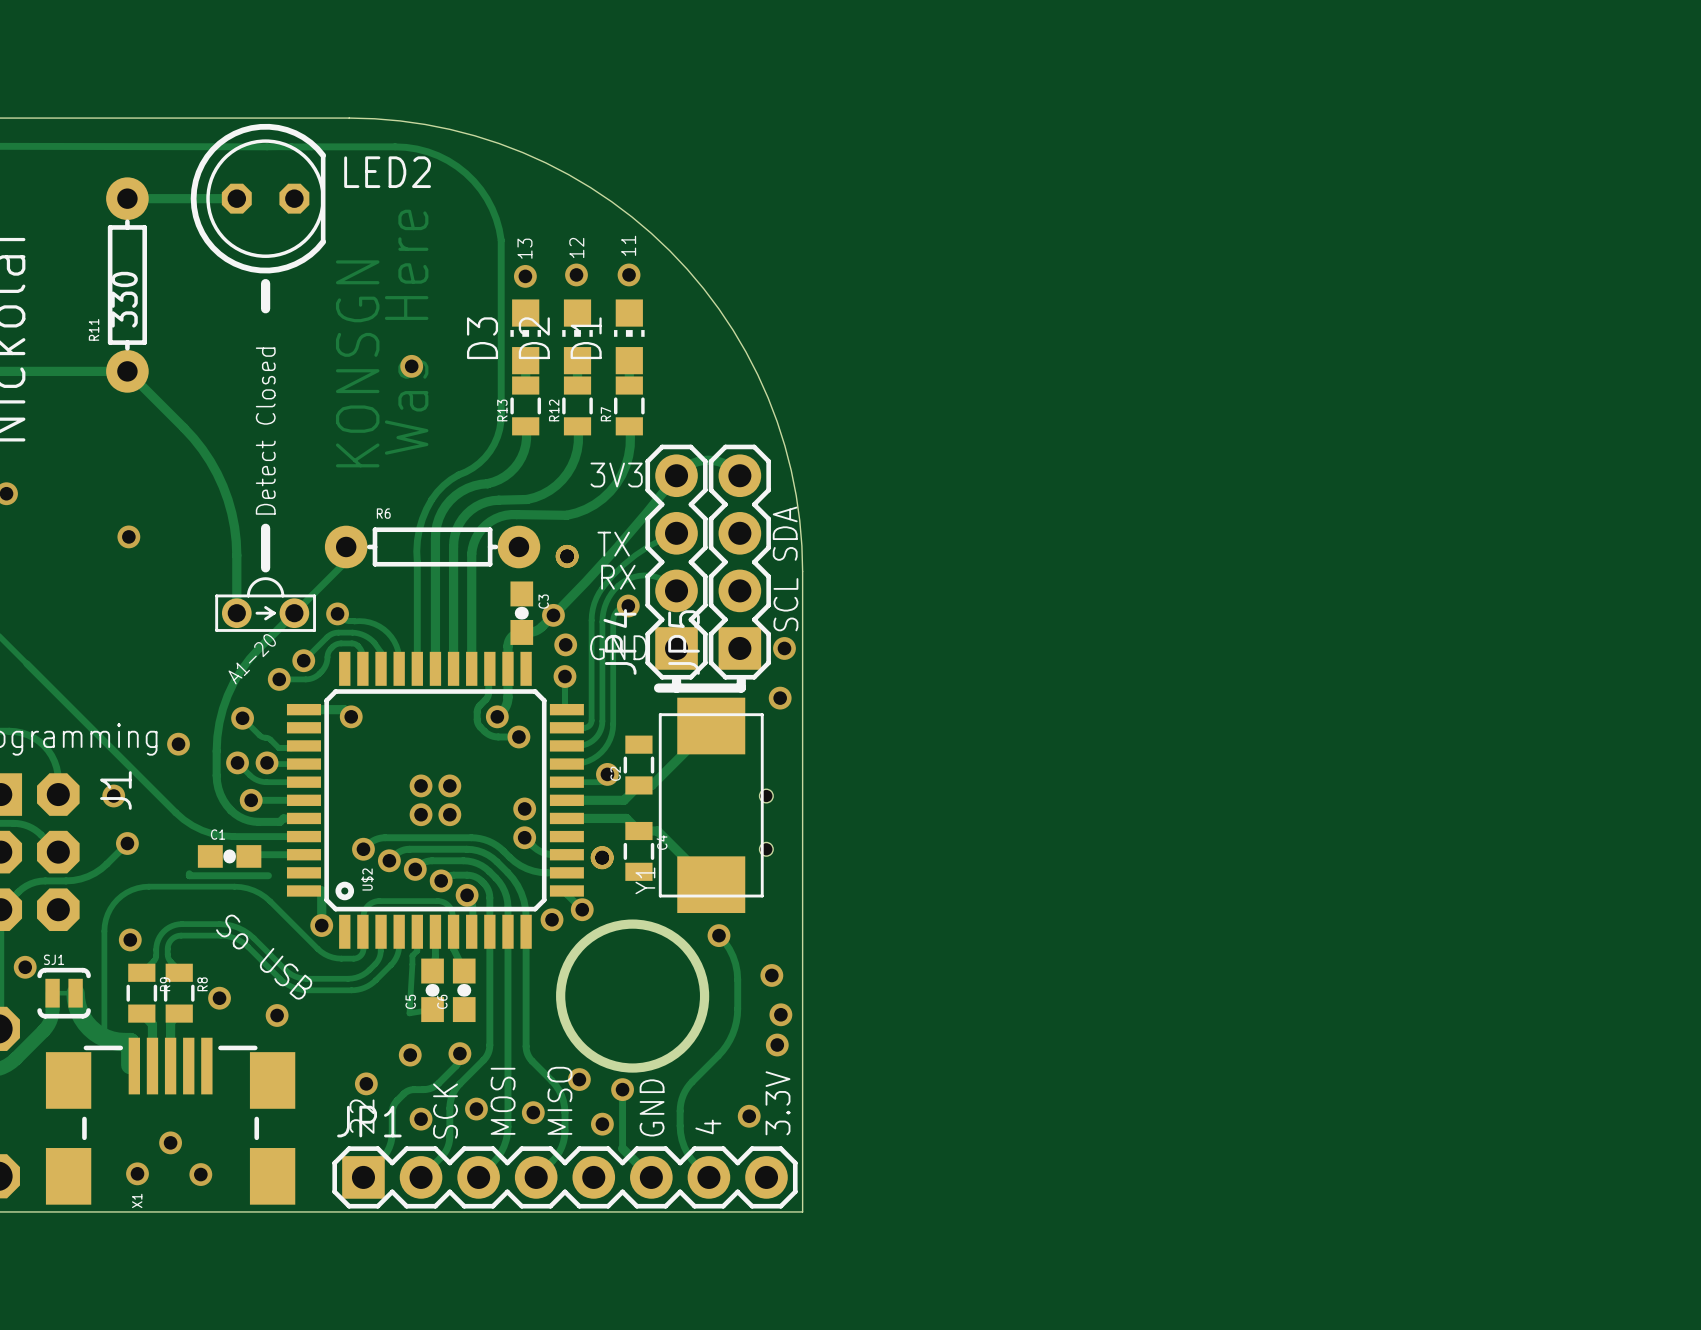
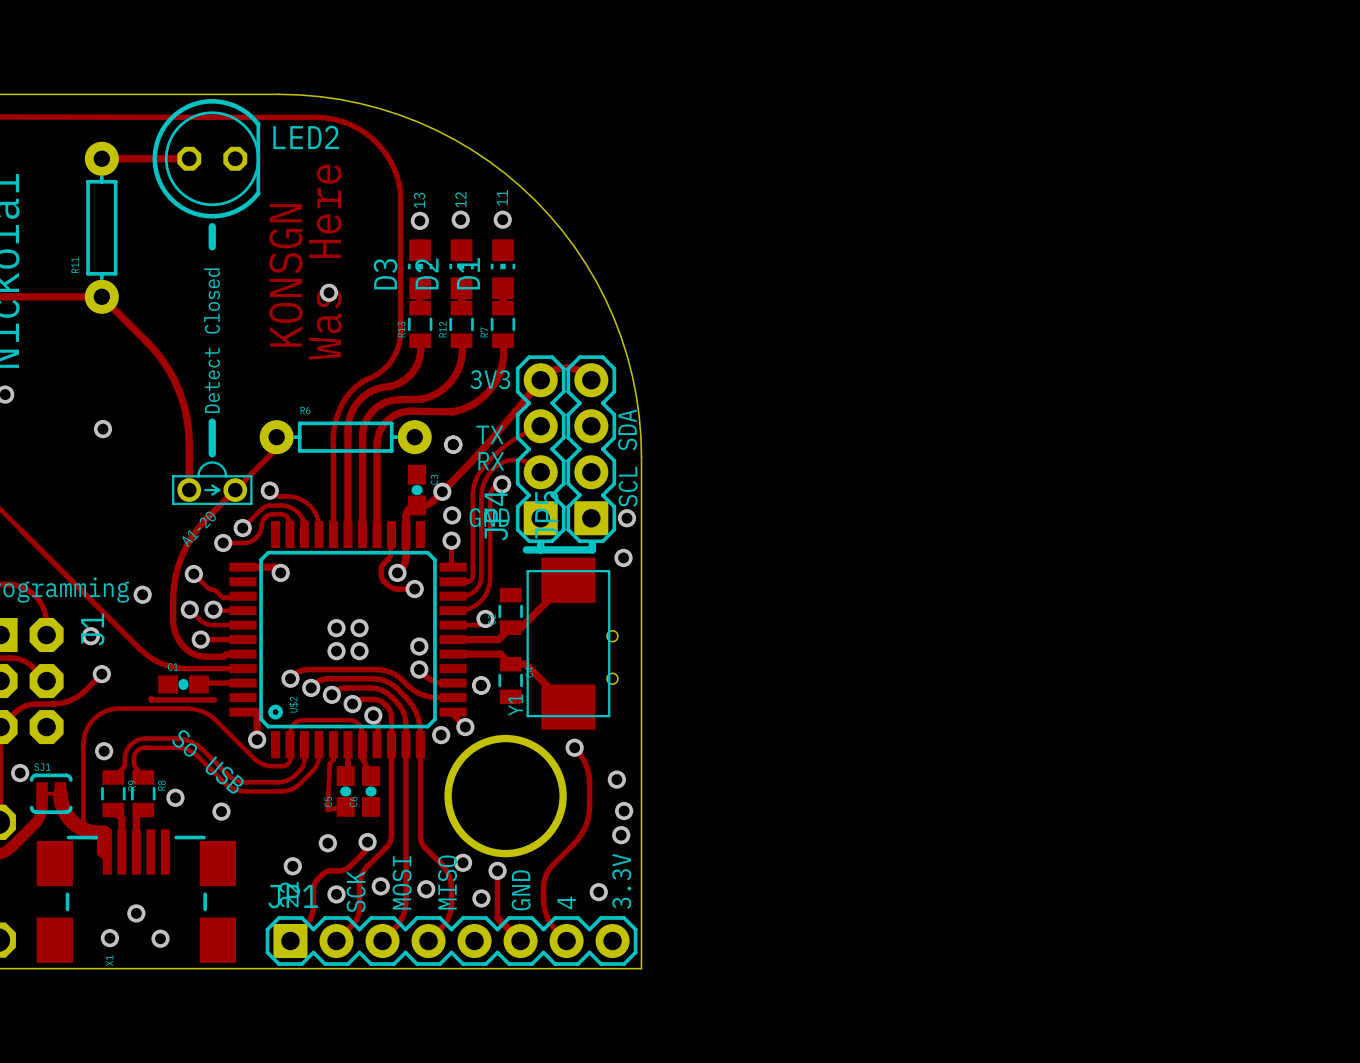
R11 value: 330 (124, 299) -> none

